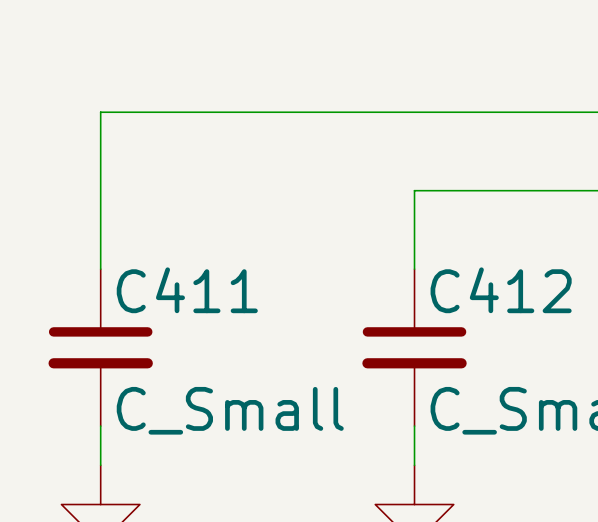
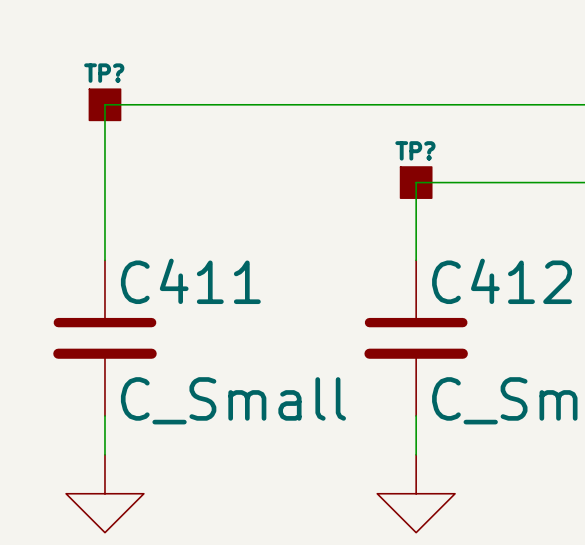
TP?: none -> (104, 104)
TP?: none -> (416, 182)

